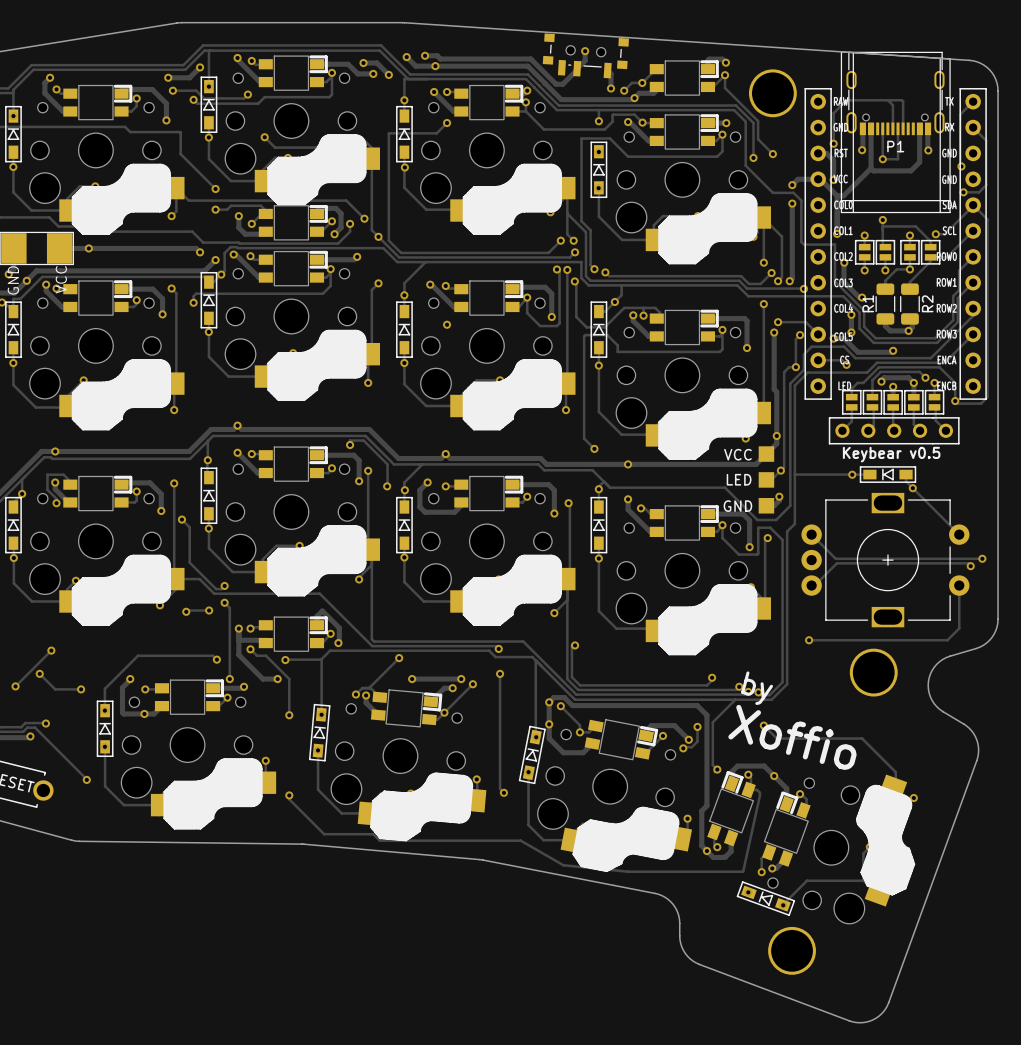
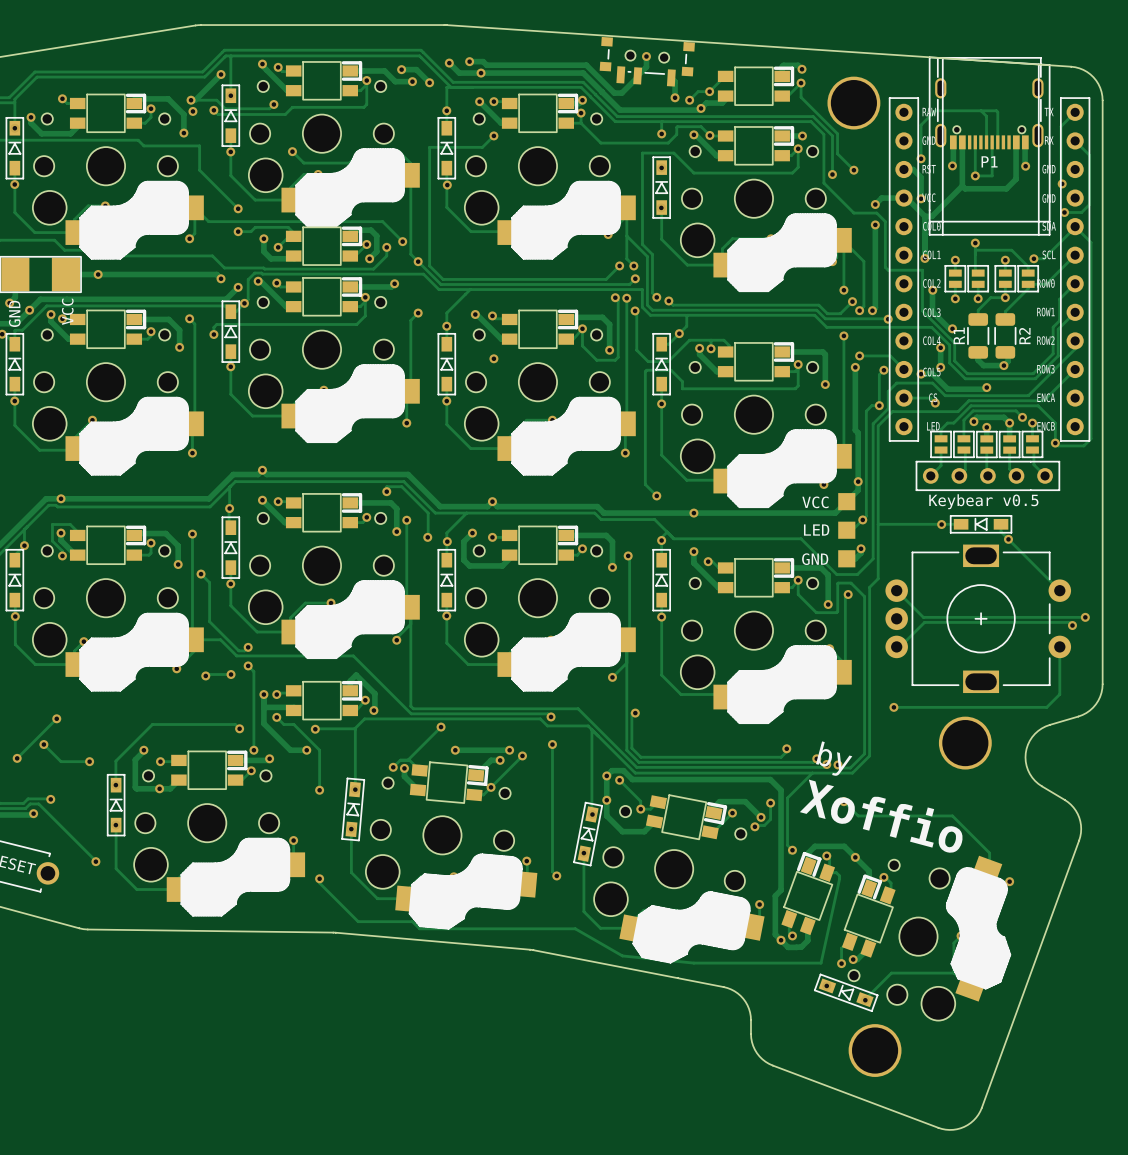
track: (50, 77) (44, 82) (44, 93) (63, 111) (73, 111) -> (31, 117) (31, 123) (41, 133) (70, 133) (81, 123)
via position: (50, 77) -> (31, 117)
track: (168, 77) (189, 77) -> (195, 100) (209, 85)
via position: (168, 77) -> (192, 111)

